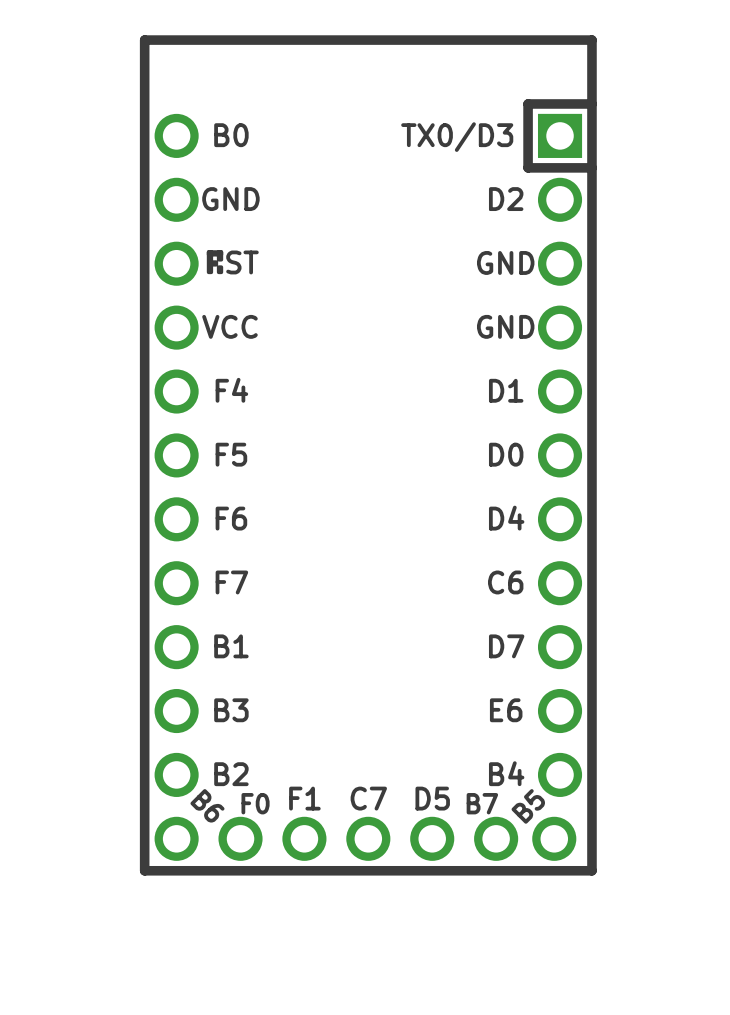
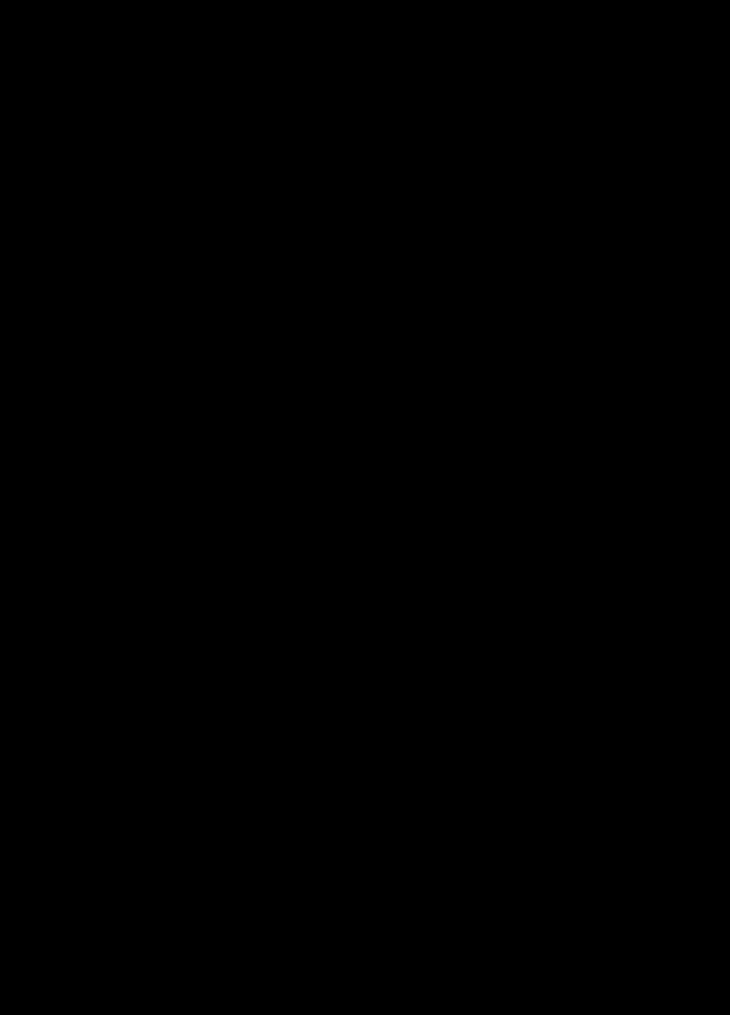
part: (368, 455) -> none

